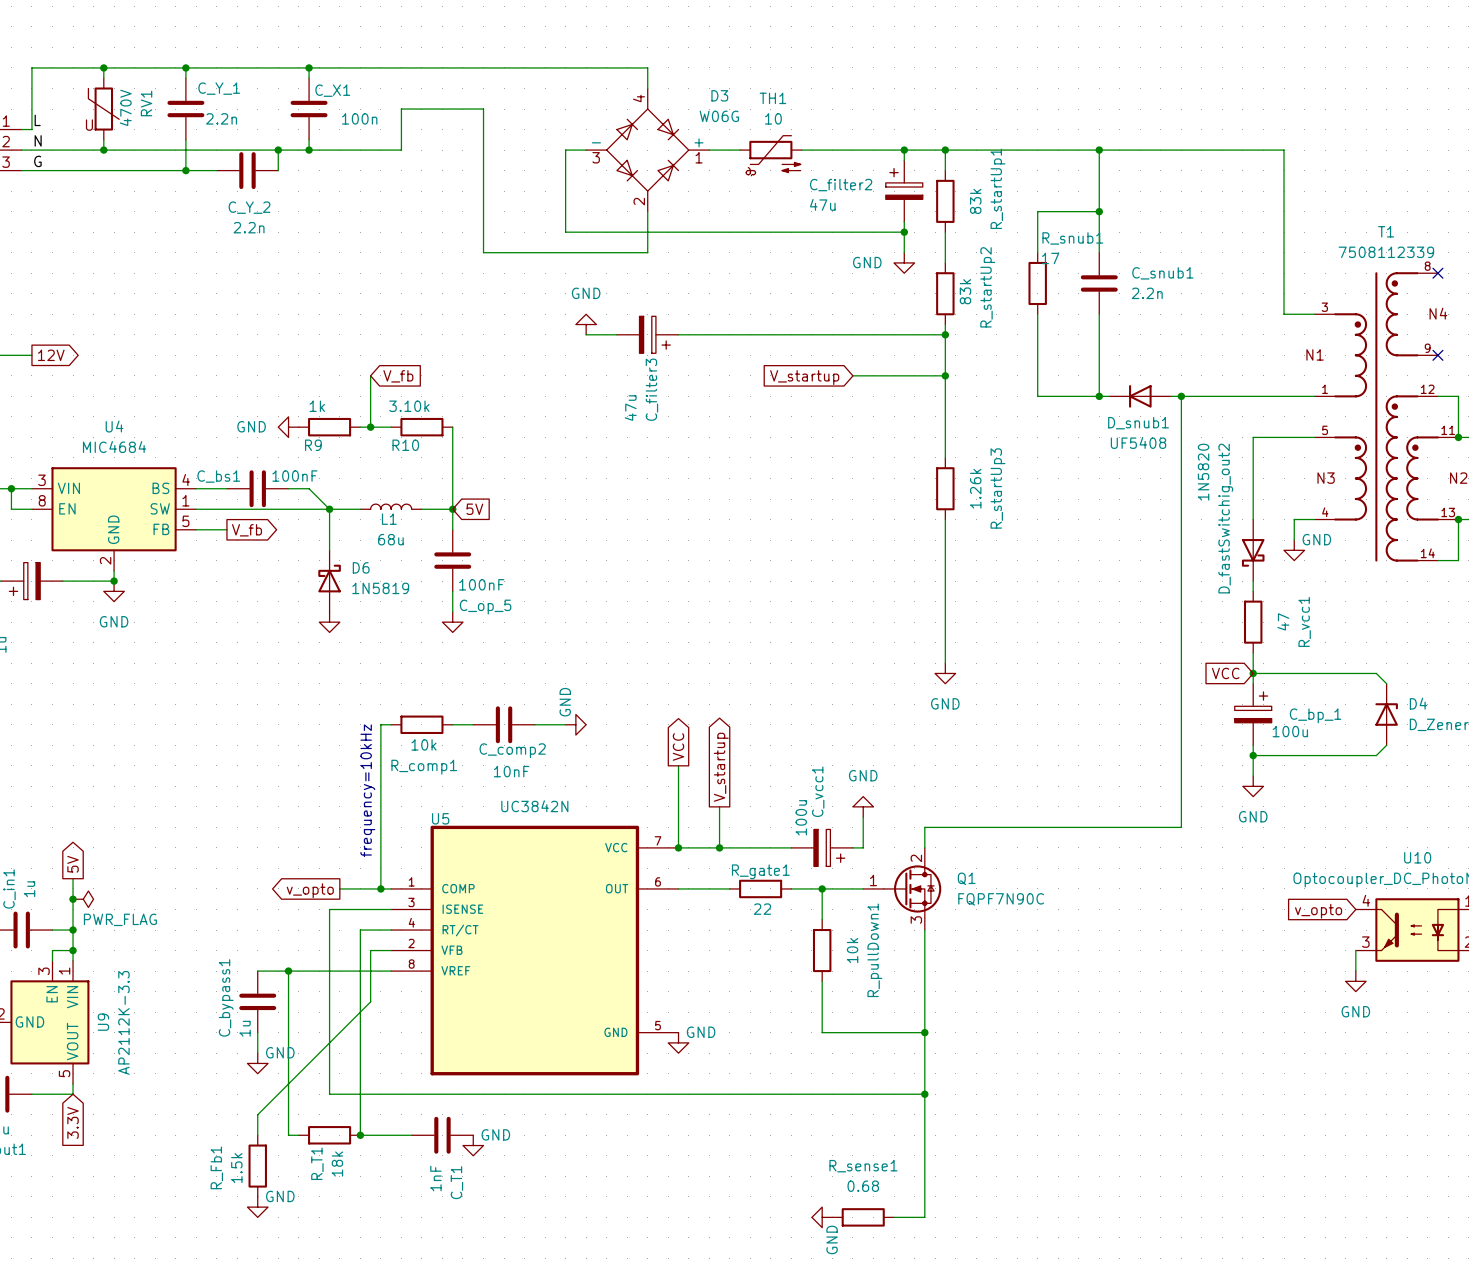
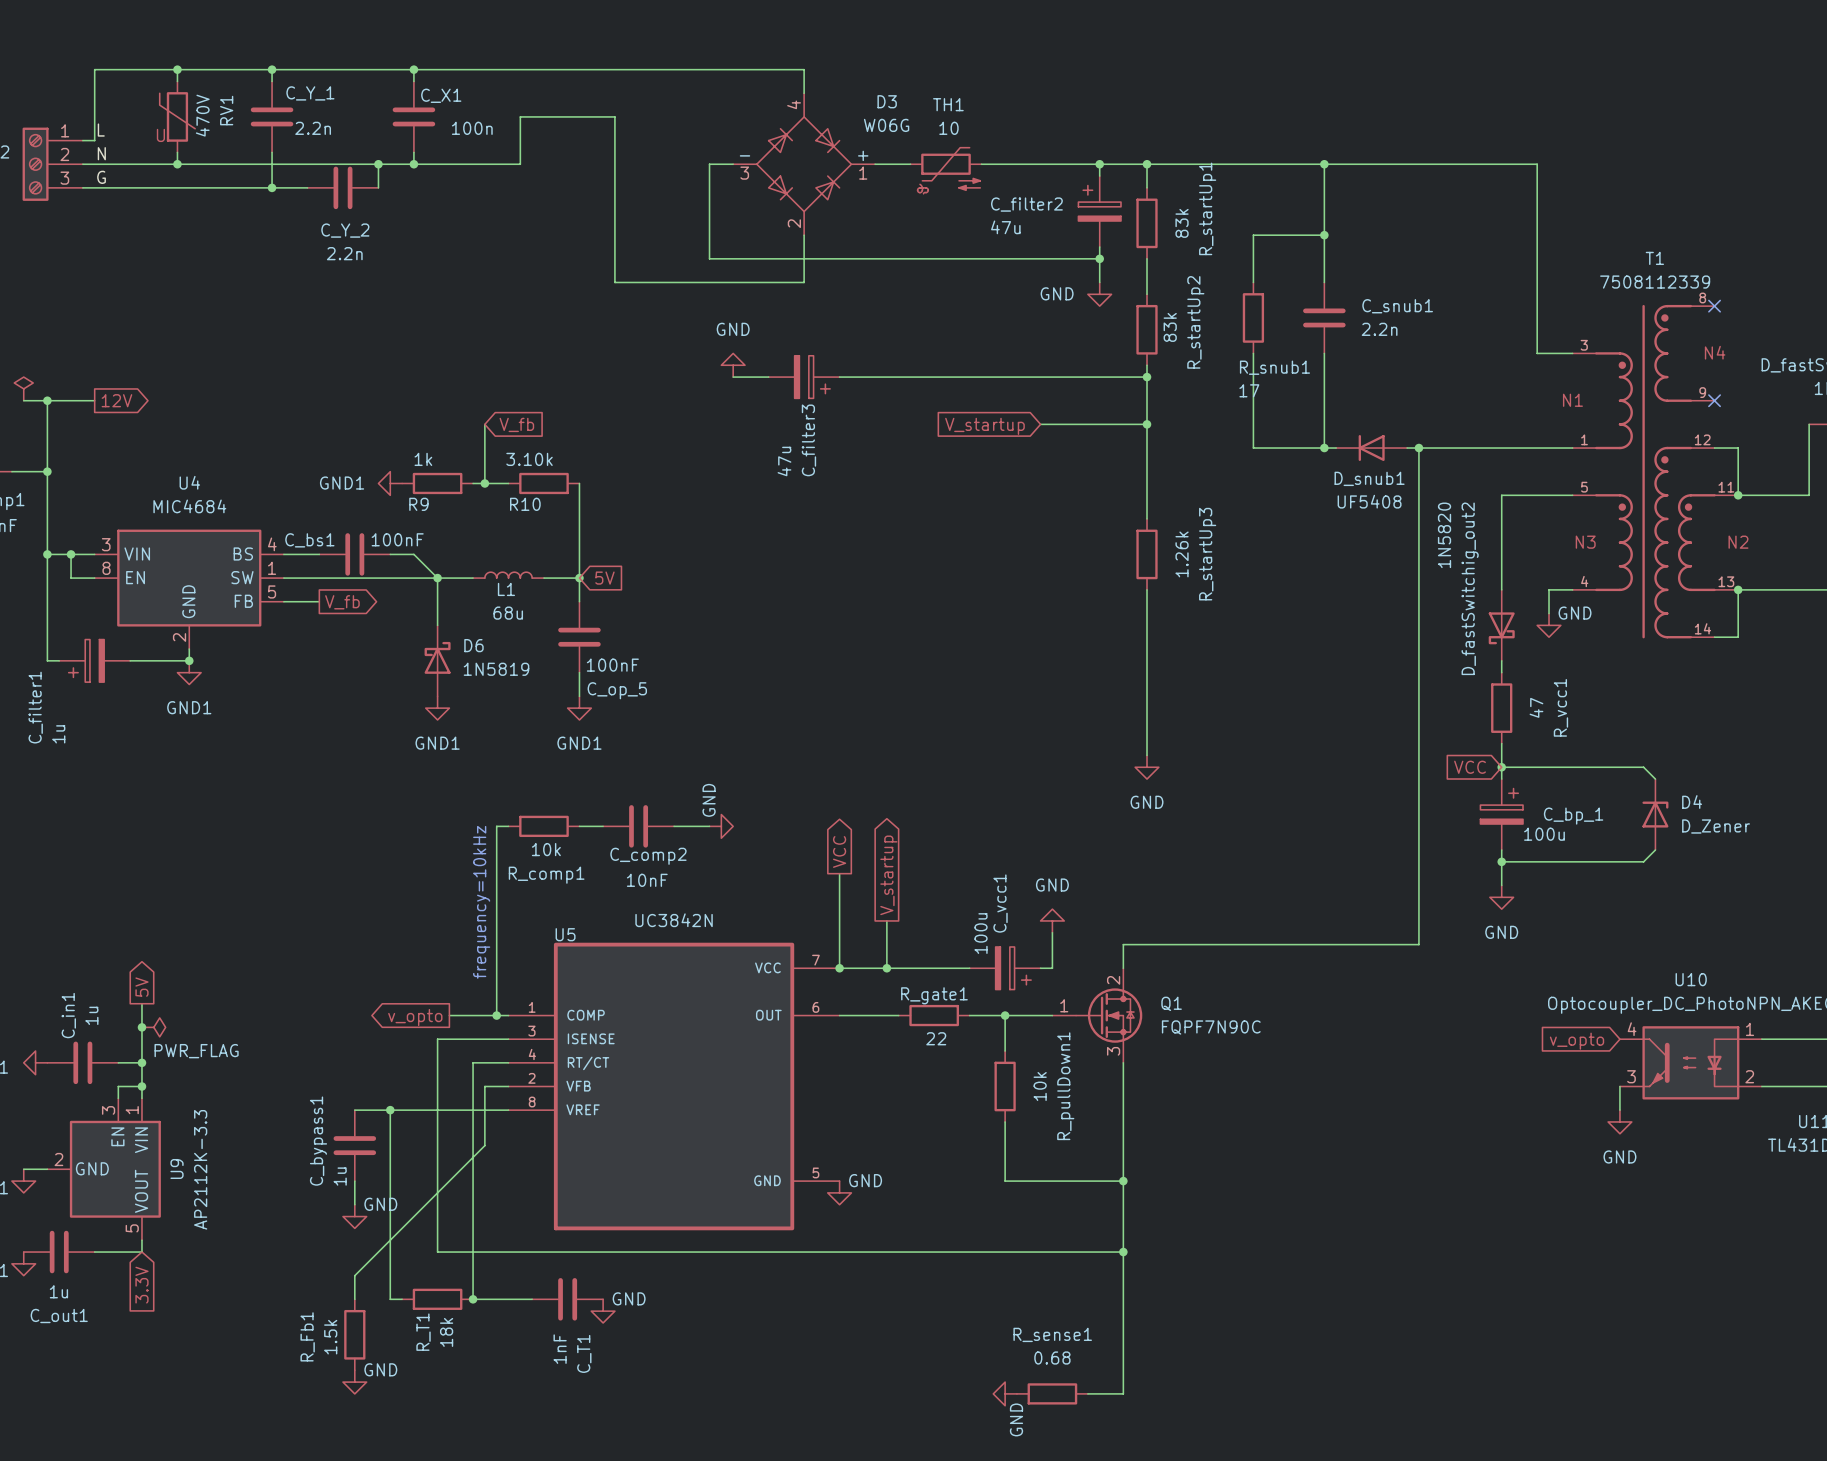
R_snub1 name position: R_snub1 (1072, 238) -> R_snub1 (1274, 367)
R_snub1 value position: 17 (1050, 258) -> 17 (1249, 390)
power symbol: GND (288, 427) -> GND1 (390, 483)
power symbol: GND (114, 591) -> GND1 (189, 672)
power symbol text: none -> GND1 (437, 743)
power symbol text: none -> GND1 (579, 743)

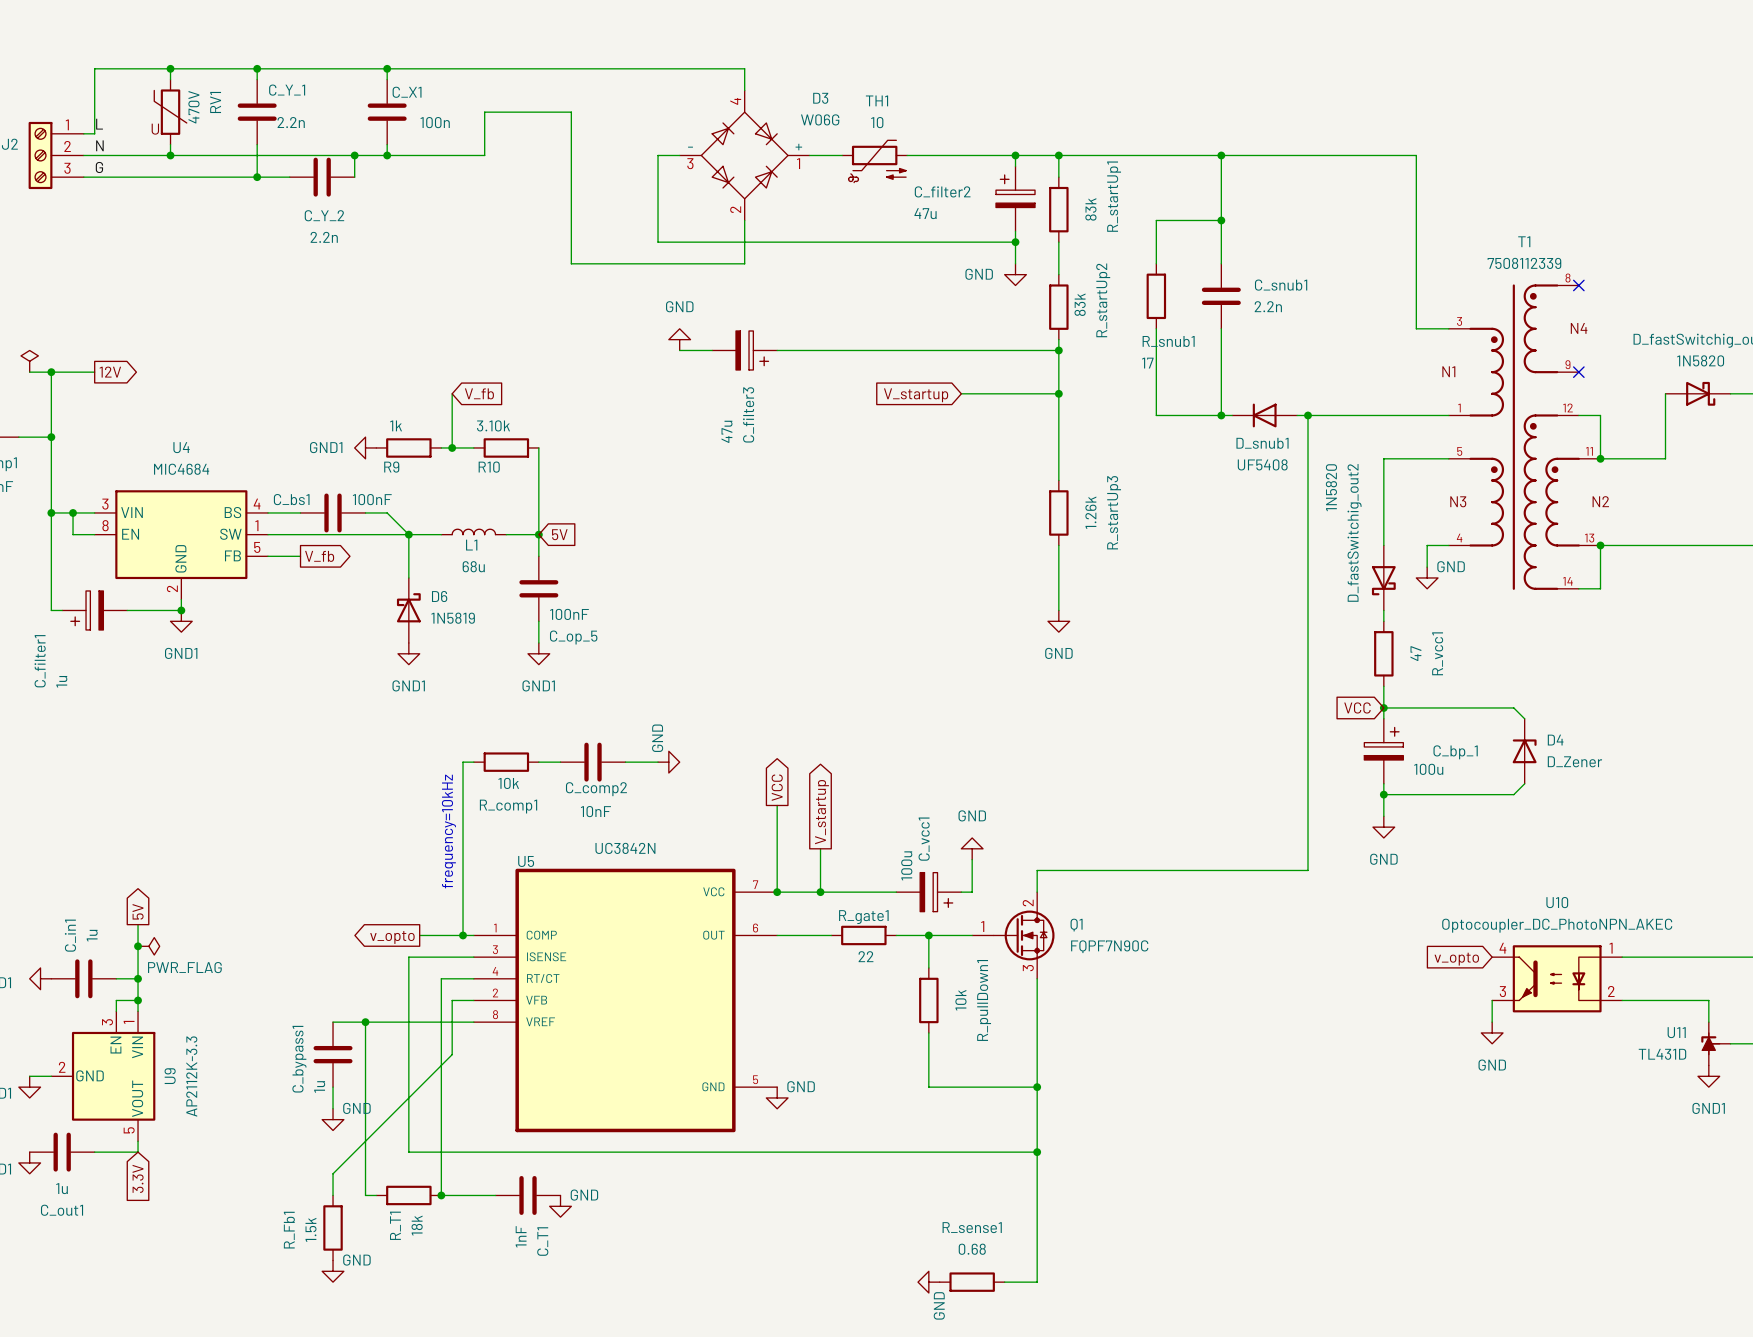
wire: (1147, 660) (1147, 755) -> none
power symbol position: GND (1147, 767) -> GND (1058, 621)

